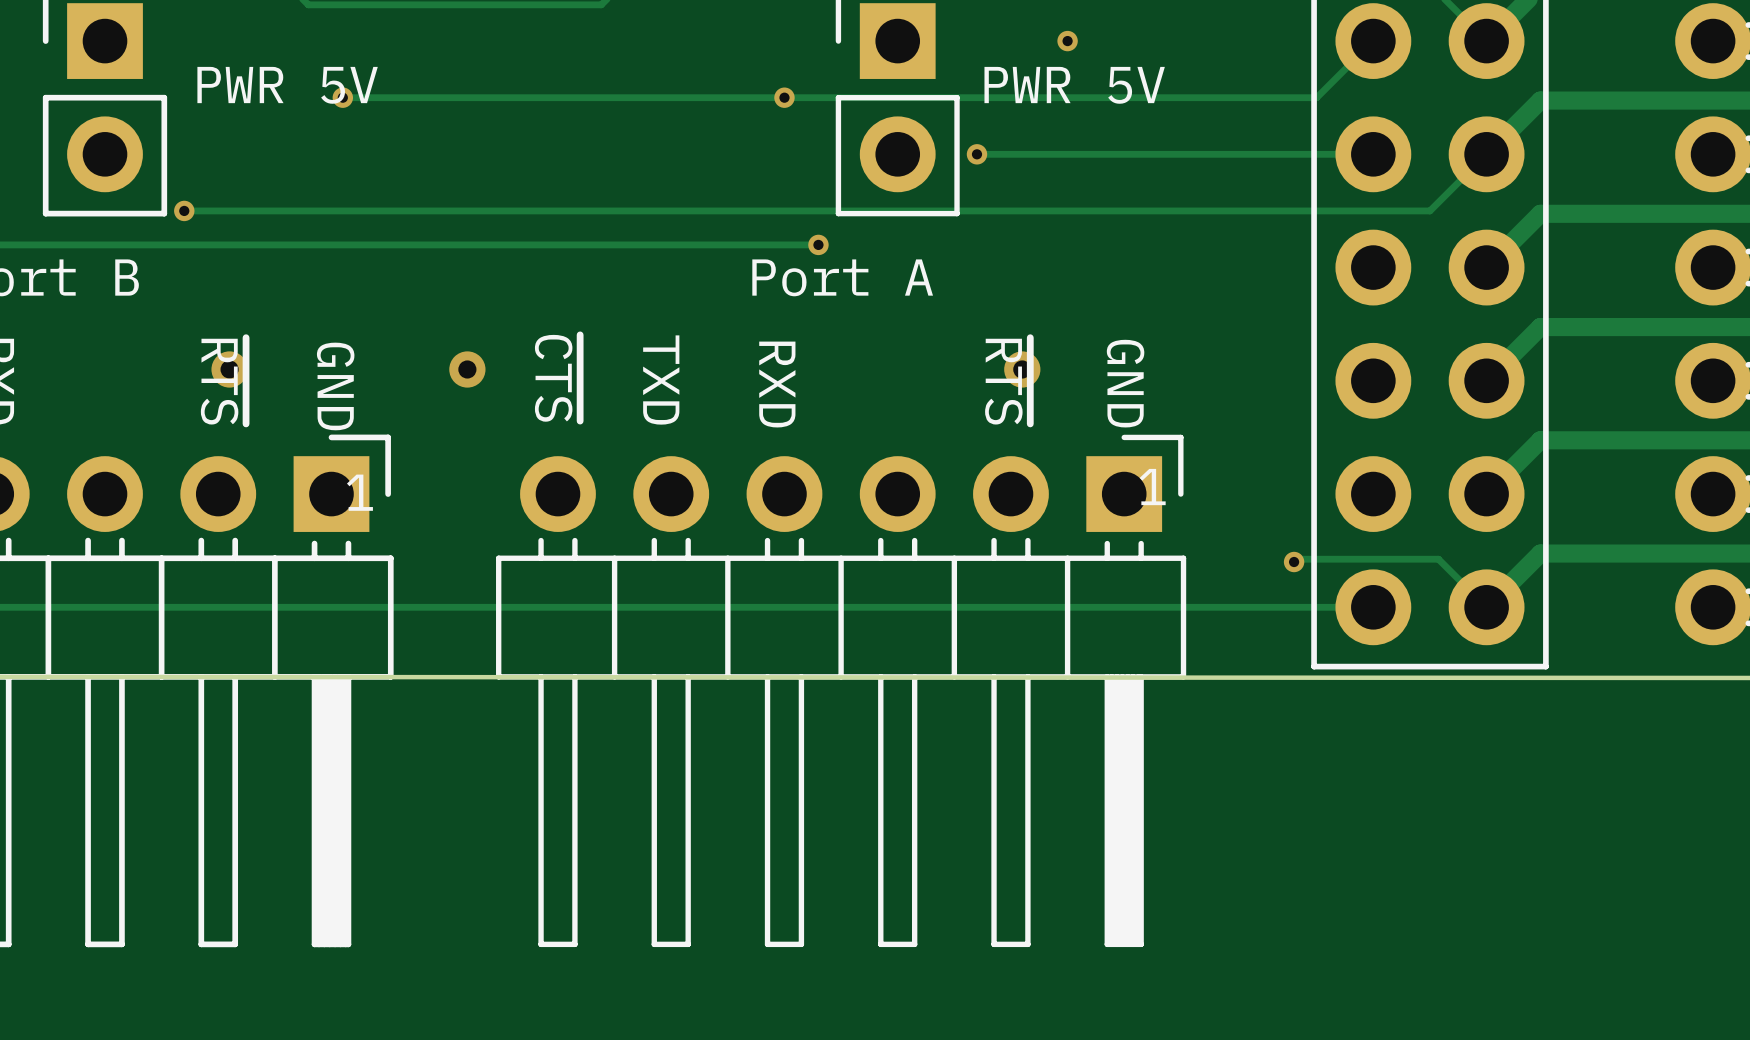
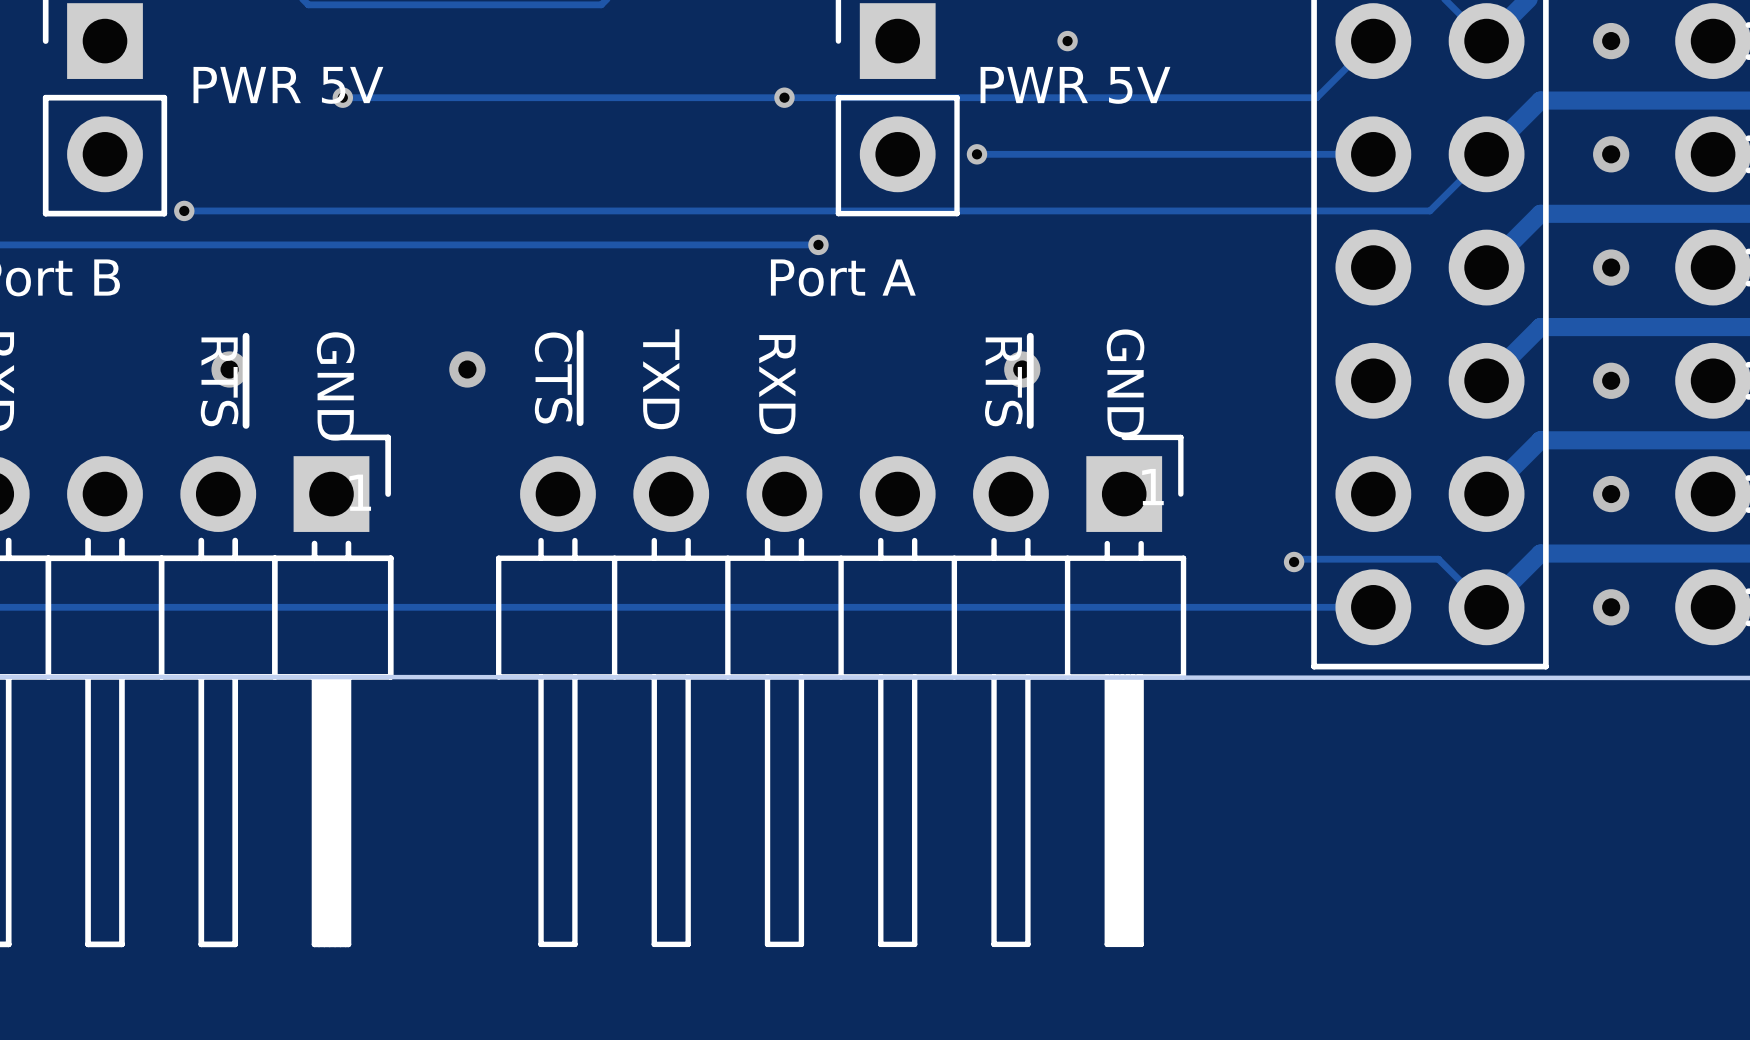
via: none -> (1611, 41)
via: none -> (1611, 154)
via: none -> (1611, 267)
via: none -> (1611, 380)
via: none -> (1611, 494)
via: none -> (1611, 607)

